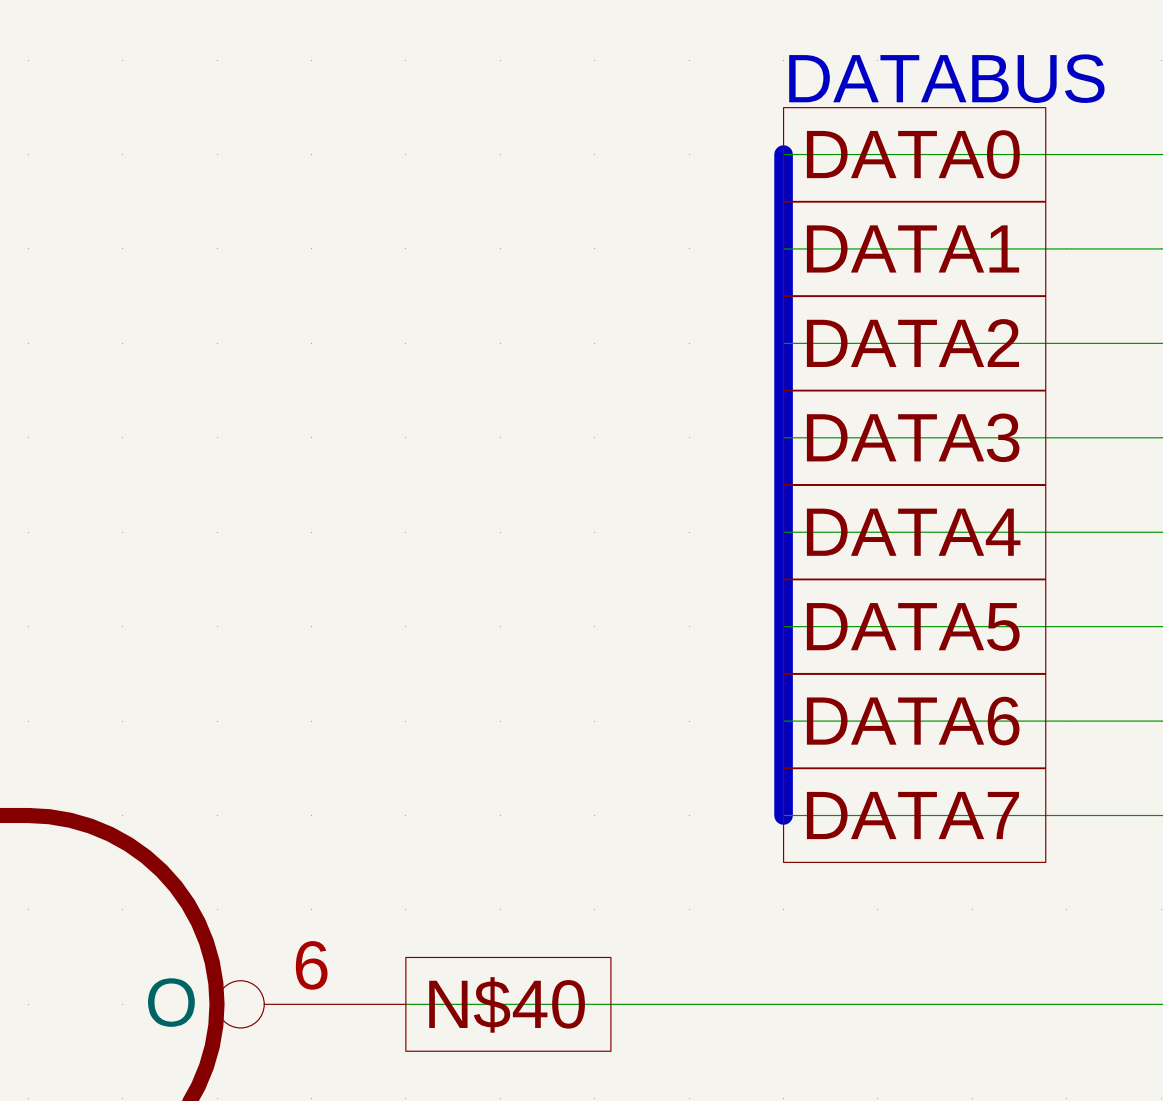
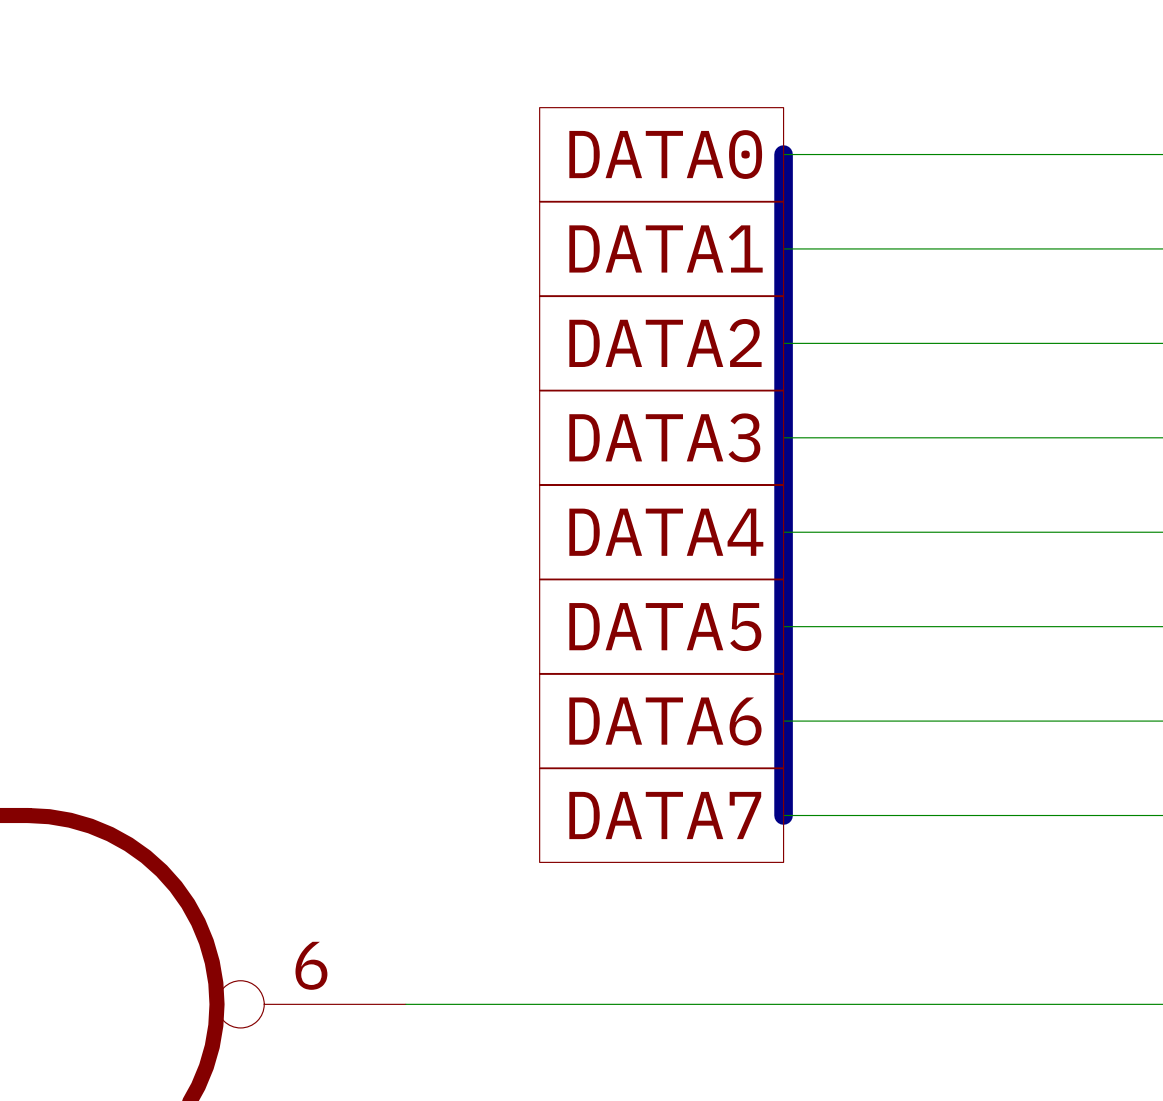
text: DATABUS (946, 78) -> none
global label rotation: 0° (913, 154) -> 180° (665, 154)
global label rotation: 0° (913, 248) -> 180° (666, 248)
global label rotation: 0° (912, 343) -> 180° (665, 342)
global label rotation: 0° (913, 437) -> 180° (664, 437)
global label rotation: 0° (913, 532) -> 180° (666, 532)
global label rotation: 0° (913, 626) -> 180° (665, 627)
global label rotation: 0° (913, 721) -> 180° (665, 721)
global label rotation: 0° (912, 815) -> 180° (665, 815)
part pin name: O (171, 1002) -> none
global label: N$40 (507, 1004) -> none

